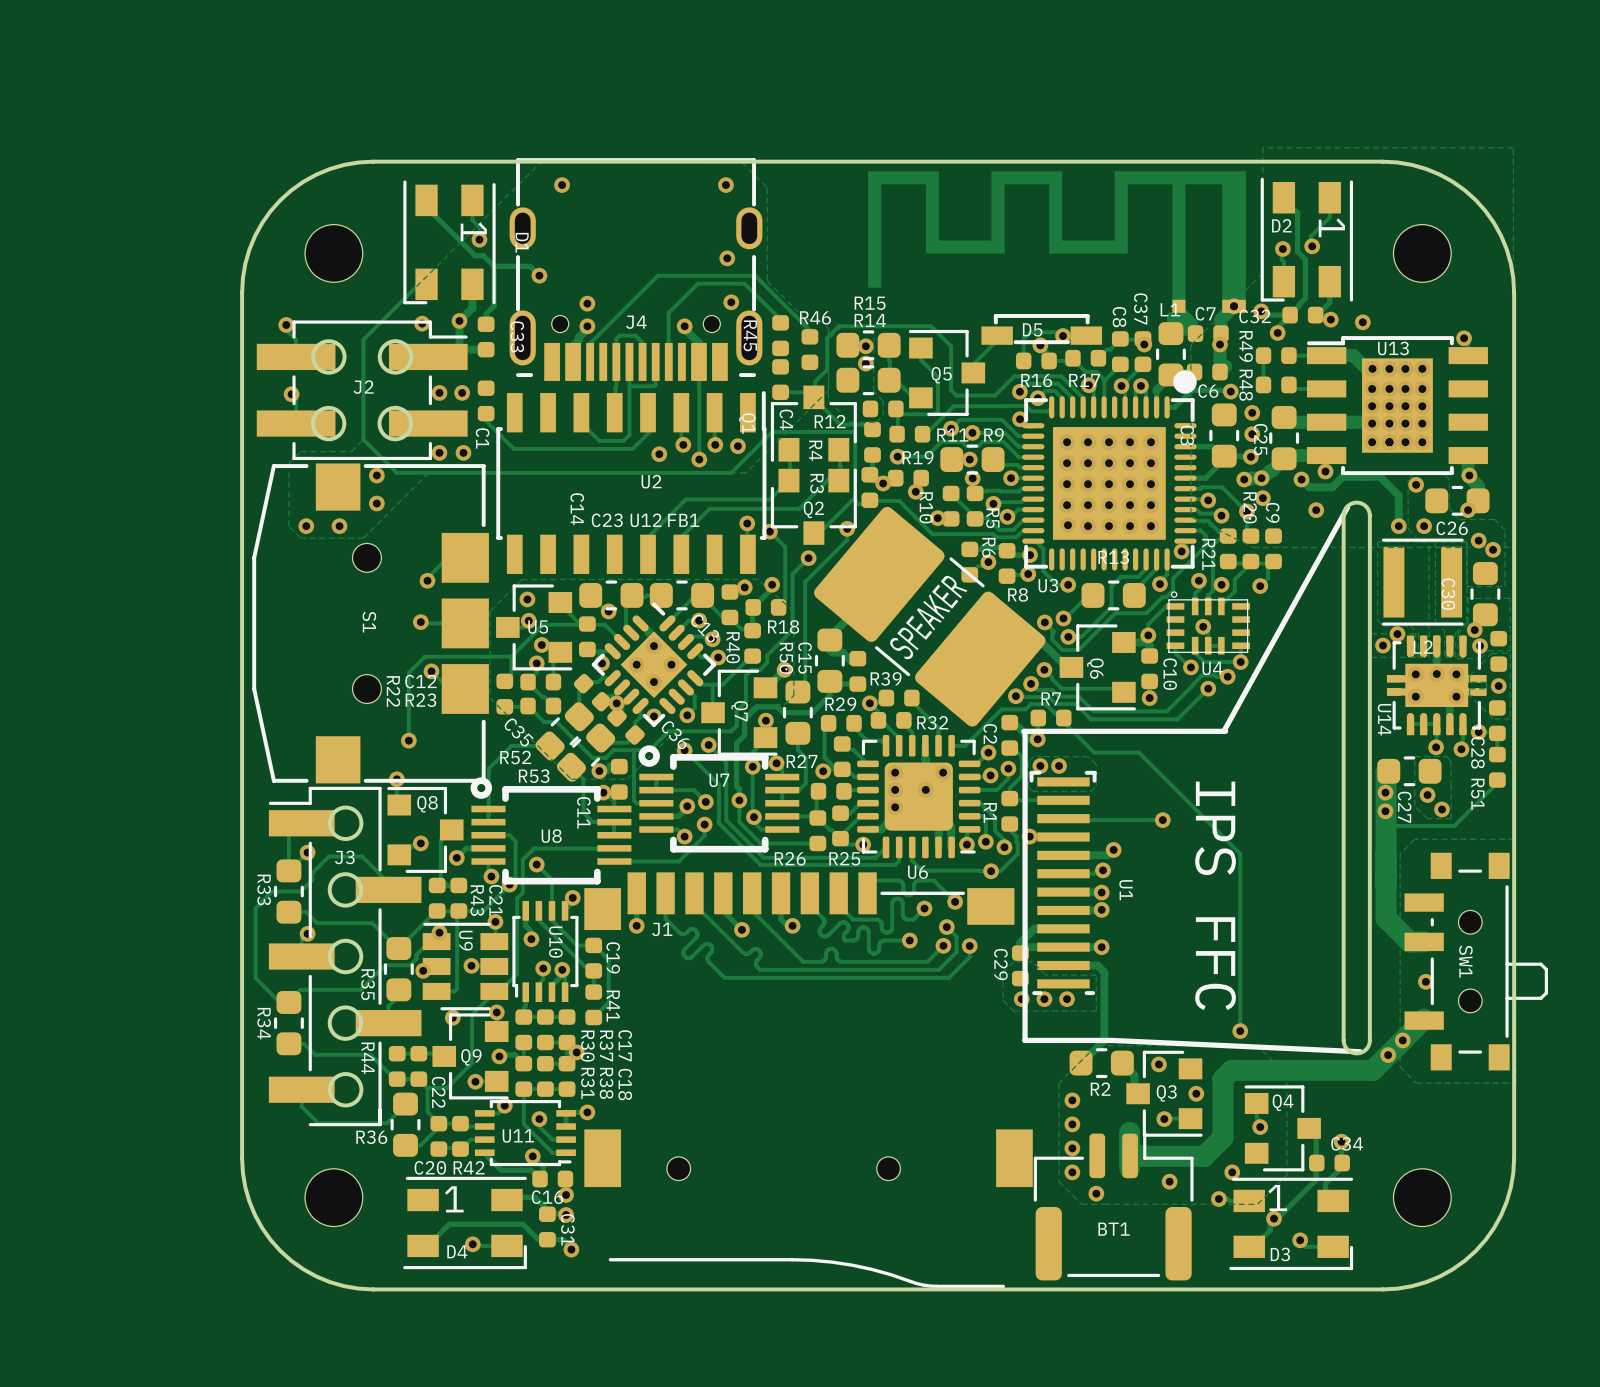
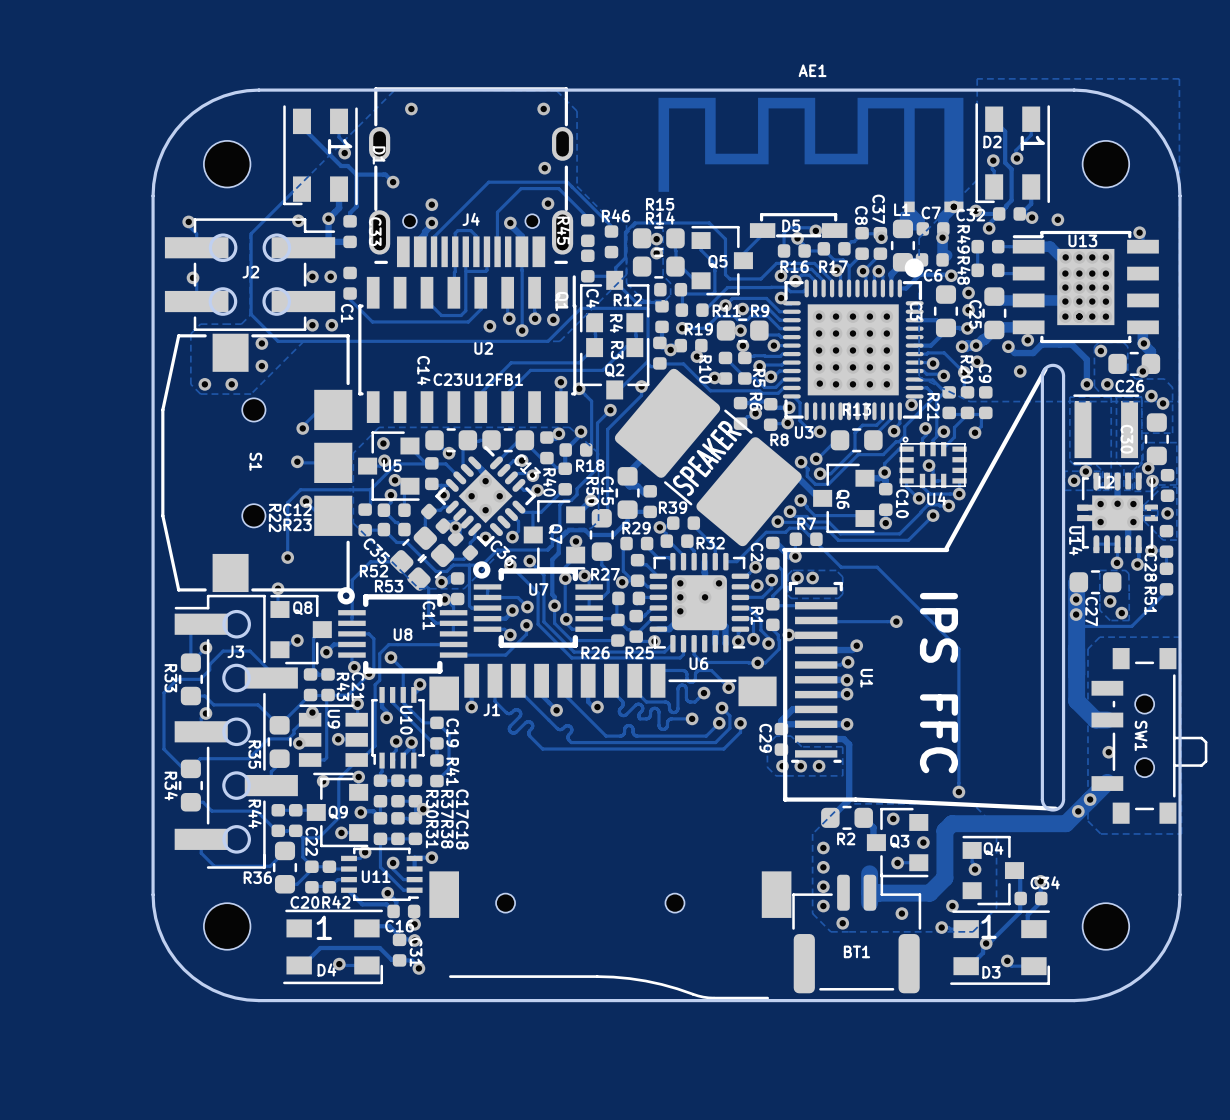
AE1 name: none -> AE1 (812, 70)

